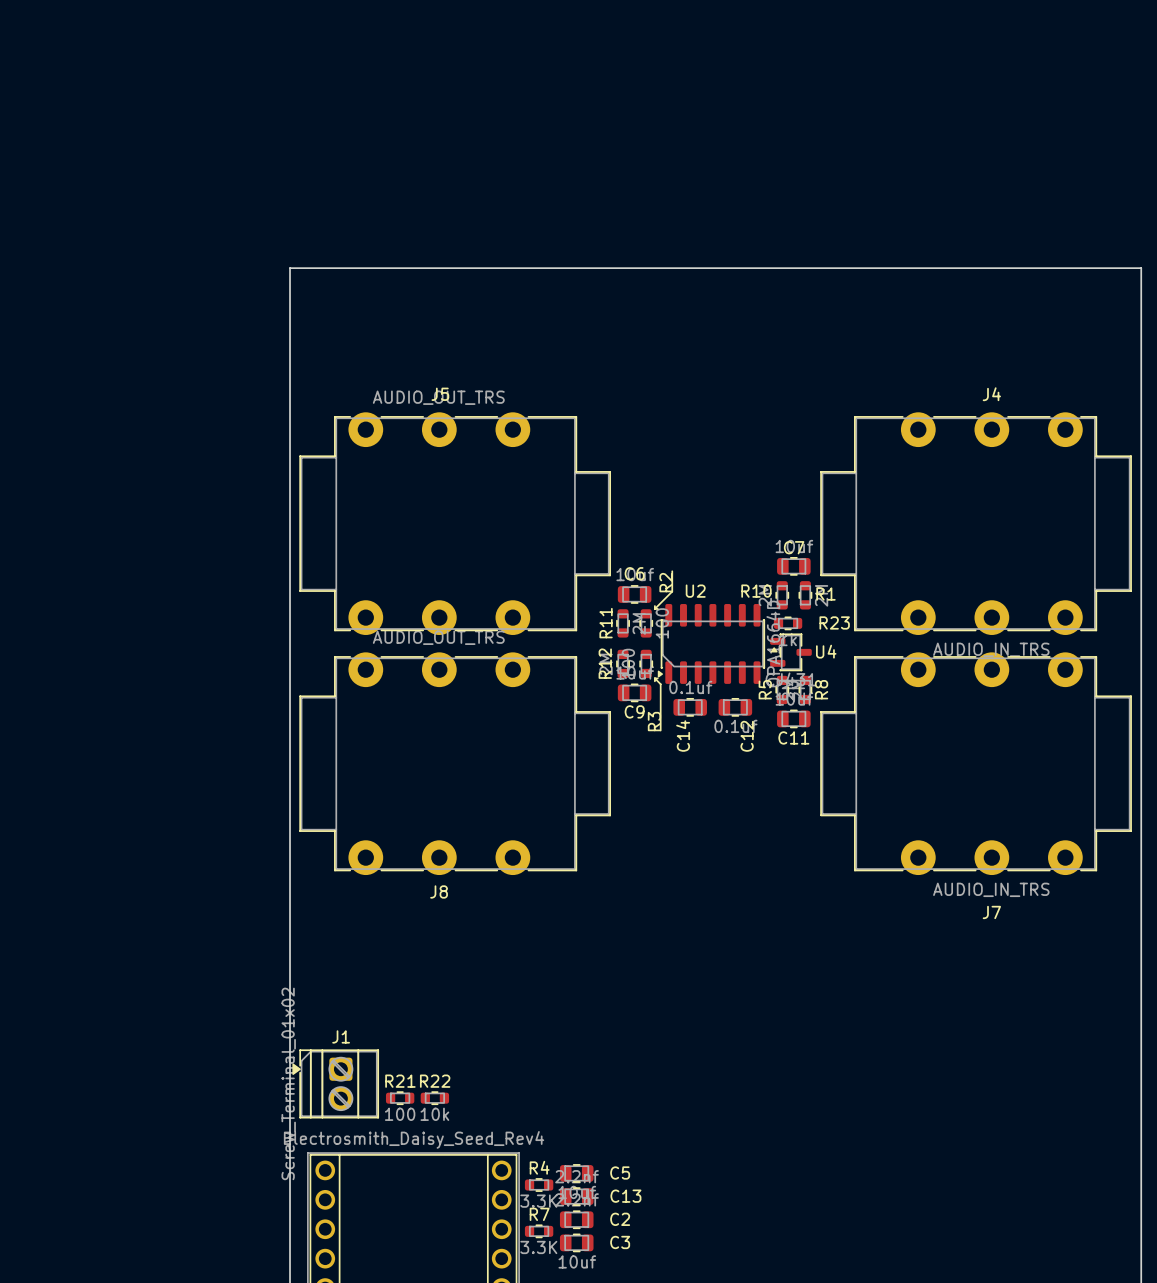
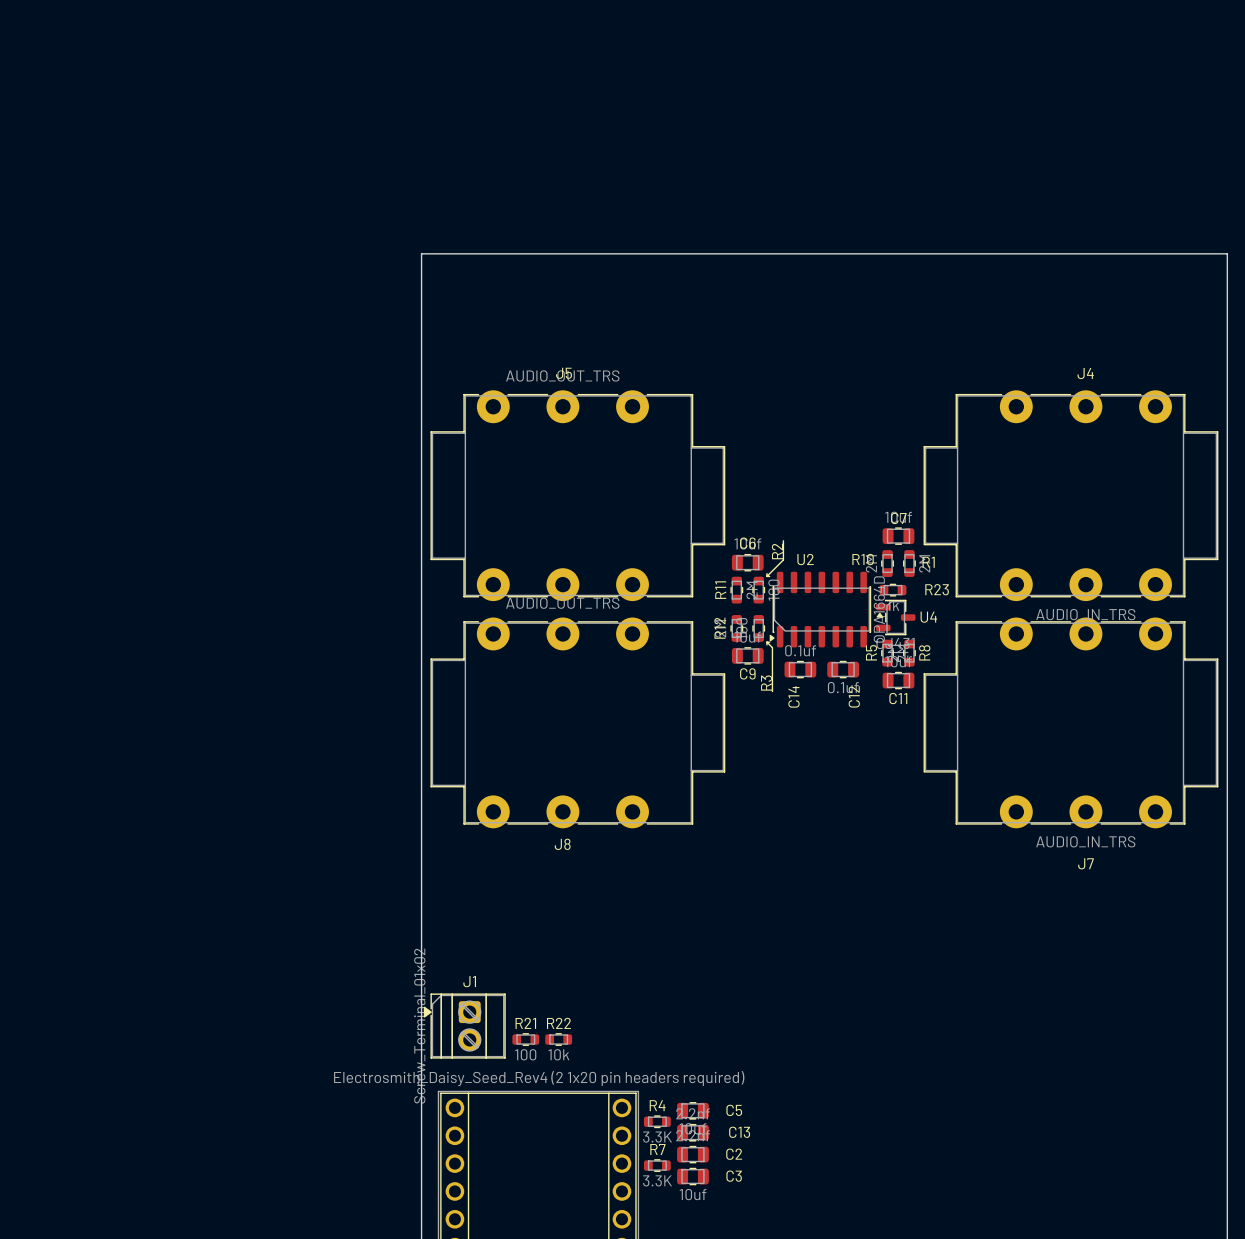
part value: Electrosmith_Daisy_Seed_Rev4 (414, 1139) -> Electrosmith_Daisy_Seed_Rev4 (2 1x20 pin headers required) (539, 1078)

